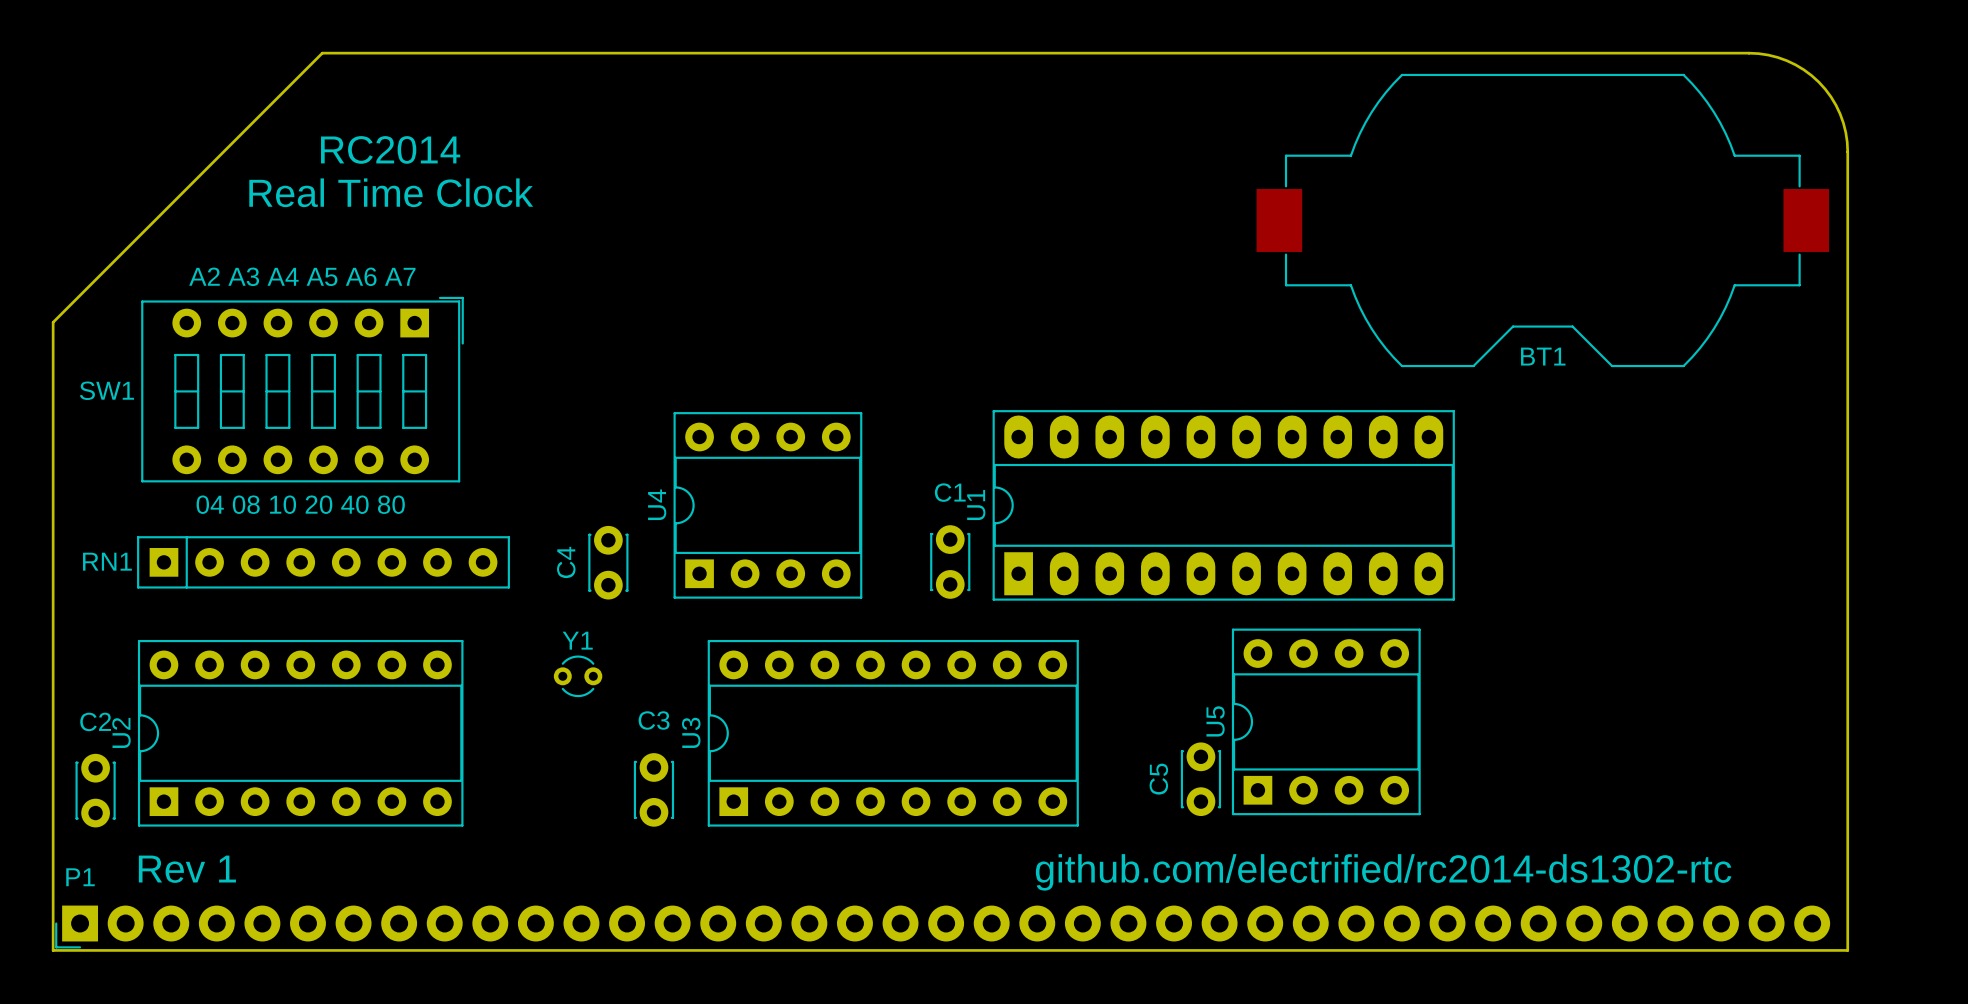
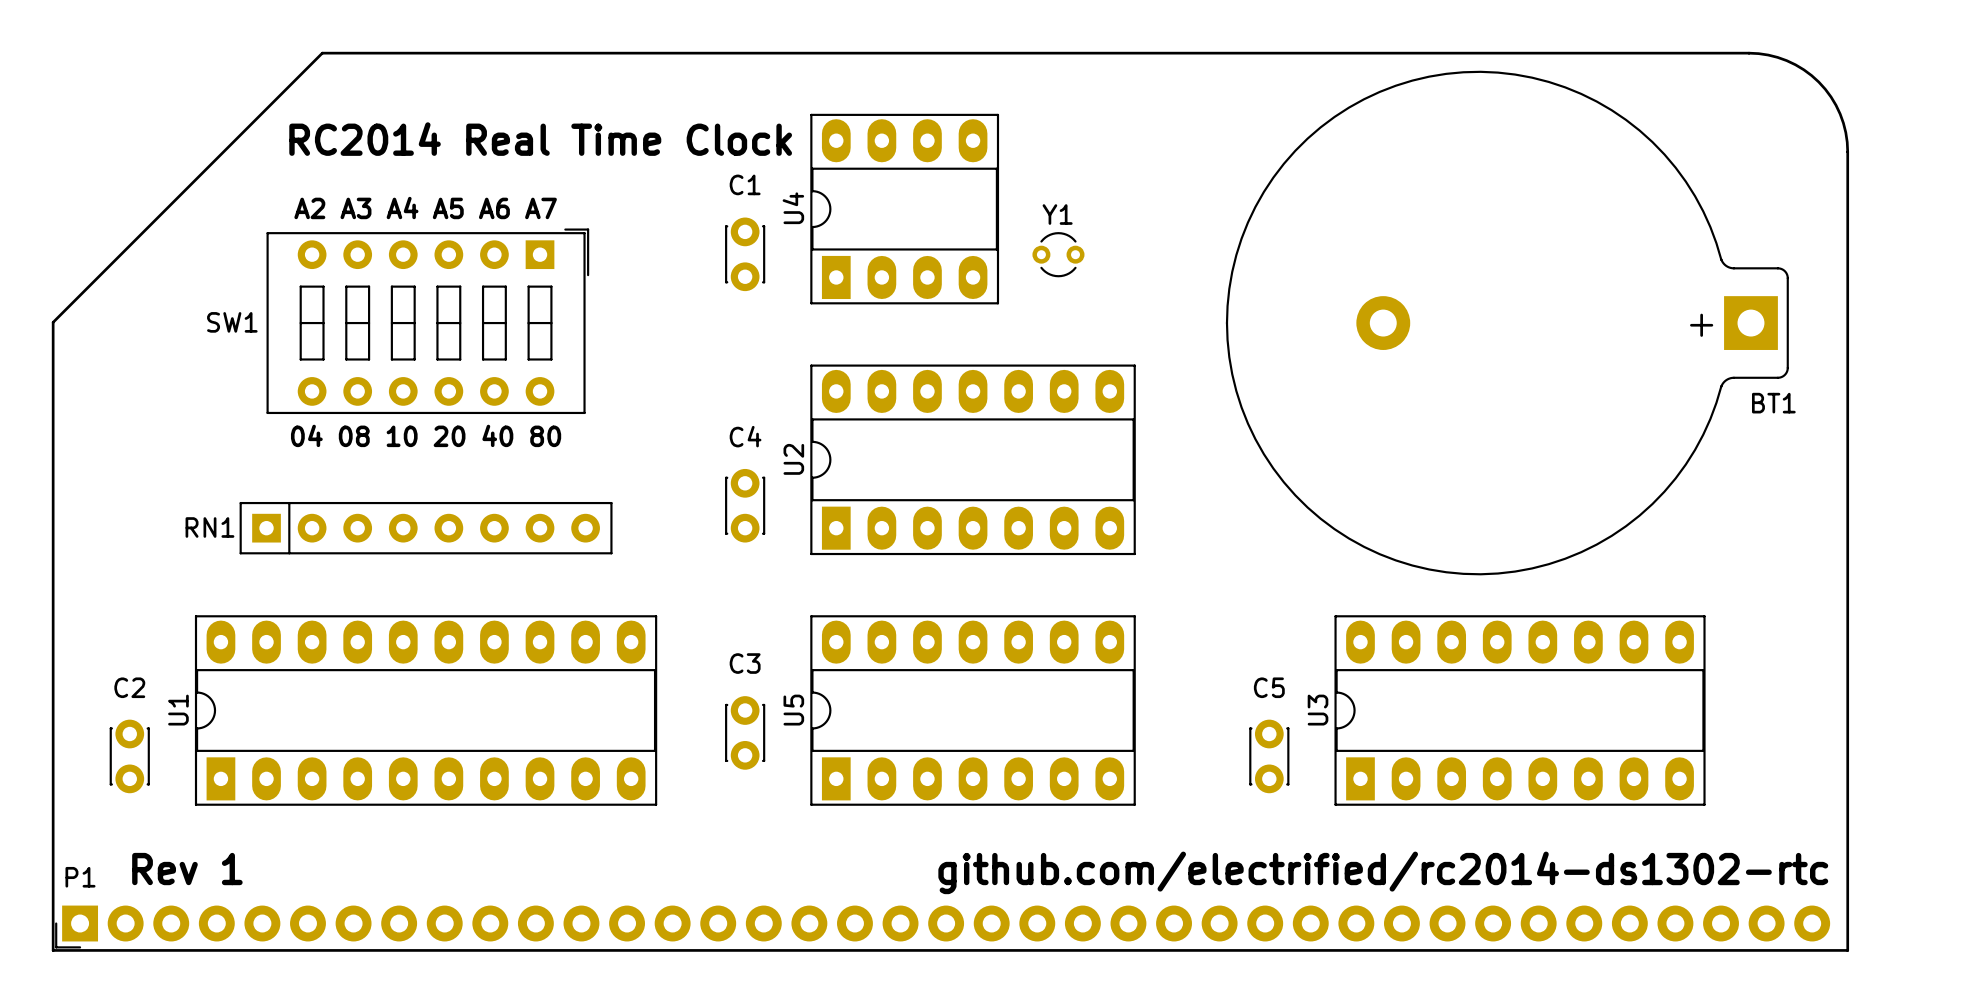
BT1 footprint: [1256, 73, 1830, 368] -> [1225, 70, 1789, 576]
text: RC2014 (390, 149) -> none
text: Real Time Clock (391, 192) -> RC2014 Real Time Clock (540, 139)
text position: A2 A3 A4 A5 A6 A7 (302, 276) -> A2 A3 A4 A5 A6 A7 (425, 208)
BT1 name position: BT1 (1543, 356) -> BT1 (1773, 403)
SW1 position: (302, 389) -> (427, 321)
U4 footprint: [673, 412, 863, 599] -> [810, 113, 1000, 305]
text position: 04 08 10 20 40 80 (300, 504) -> 04 08 10 20 40 80 (426, 435)
U1 position: (1223, 505) -> (426, 710)
RN1 position: (323, 562) -> (426, 528)
C4 name rotation: 0° (566, 562) -> 90° clockwise (745, 436)
C4 name position: C4 (566, 562) -> C4 (745, 436)
C4 position: (608, 562) -> (745, 505)
C1 position: (950, 562) -> (745, 254)
U5 footprint: [1231, 628, 1421, 816] -> [810, 615, 1136, 806]
U2 footprint: [137, 639, 464, 827] -> [810, 364, 1136, 556]
U3 footprint: [707, 639, 1079, 827] -> [1334, 615, 1706, 806]
Y1 footprint: [553, 655, 603, 698] -> [1032, 232, 1085, 278]
U5 name position: U5 (1215, 721) -> U5 (793, 710)
C5 name rotation: 0° (1158, 779) -> 90° clockwise (1269, 687)
C5 name position: C5 (1158, 779) -> C5 (1269, 687)
C5 position: (1200, 779) -> (1269, 756)
C3 position: (653, 789) -> (745, 732)
C2 position: (95, 790) -> (129, 756)

